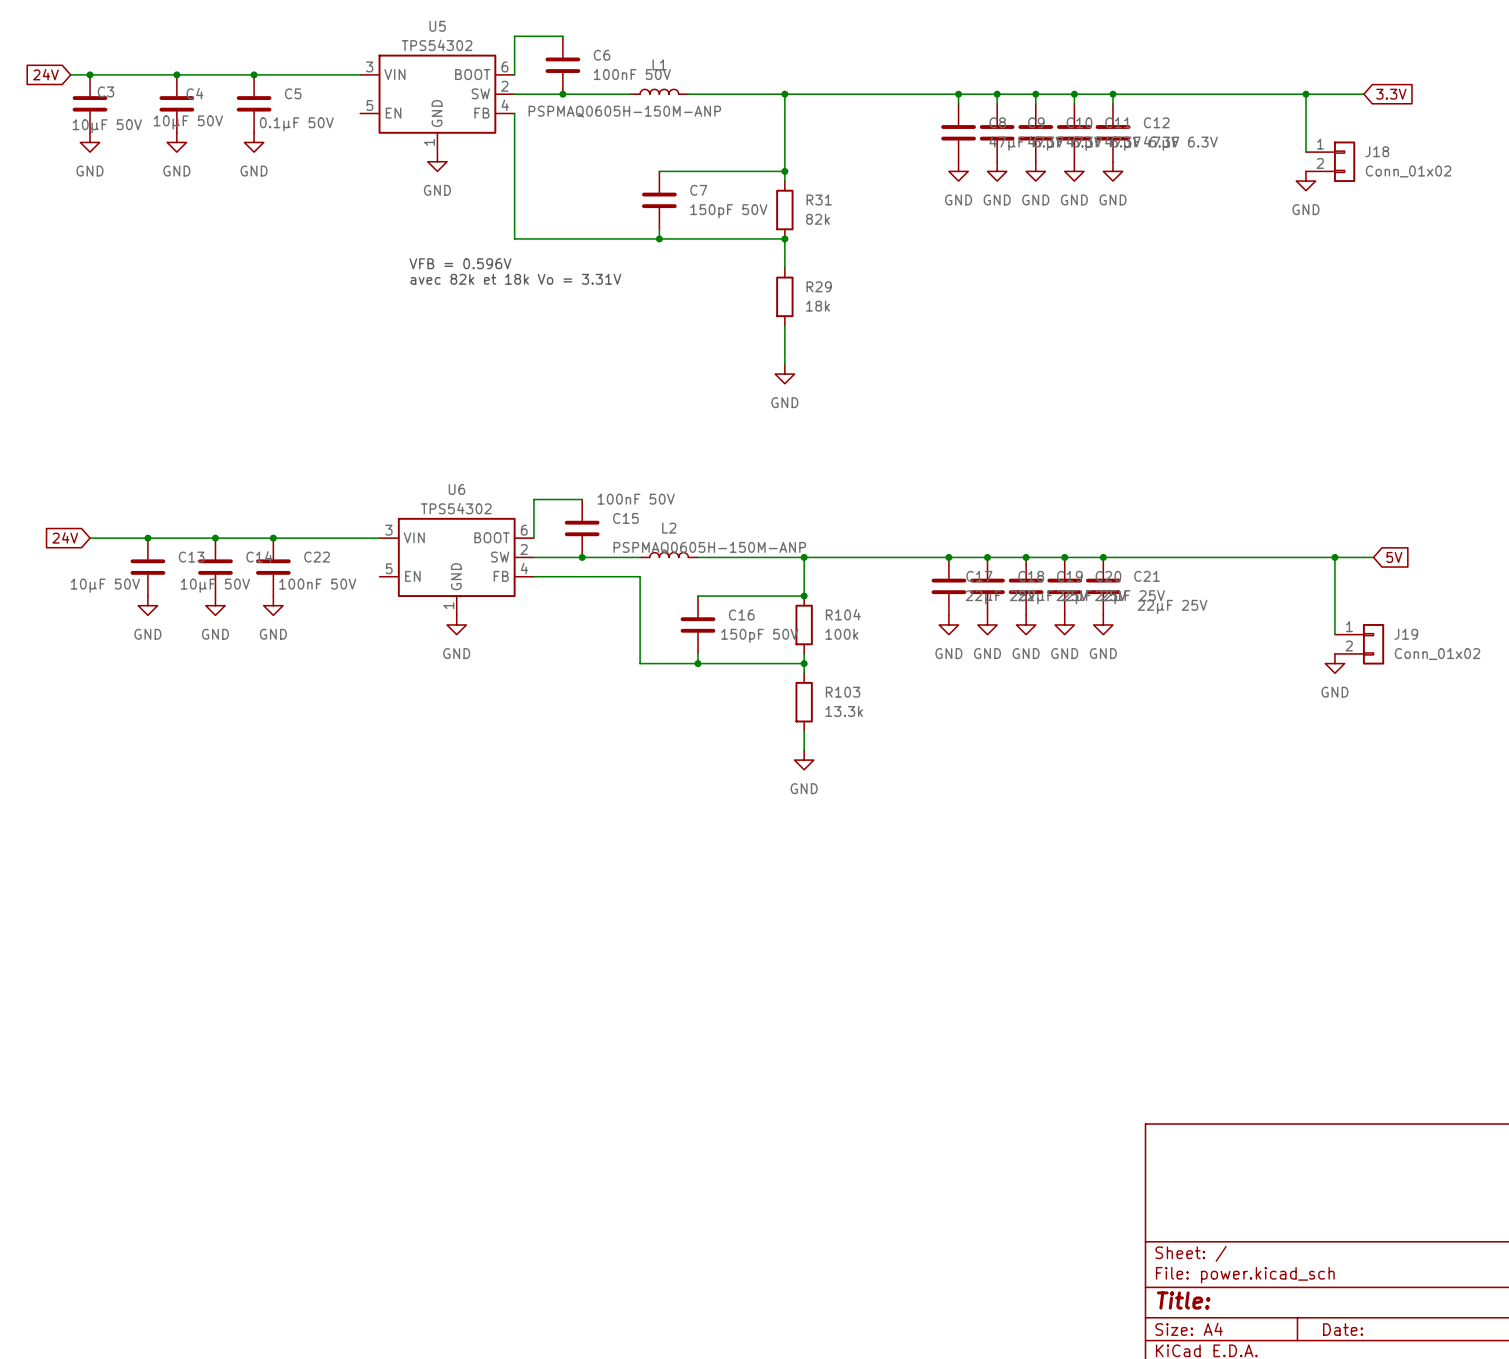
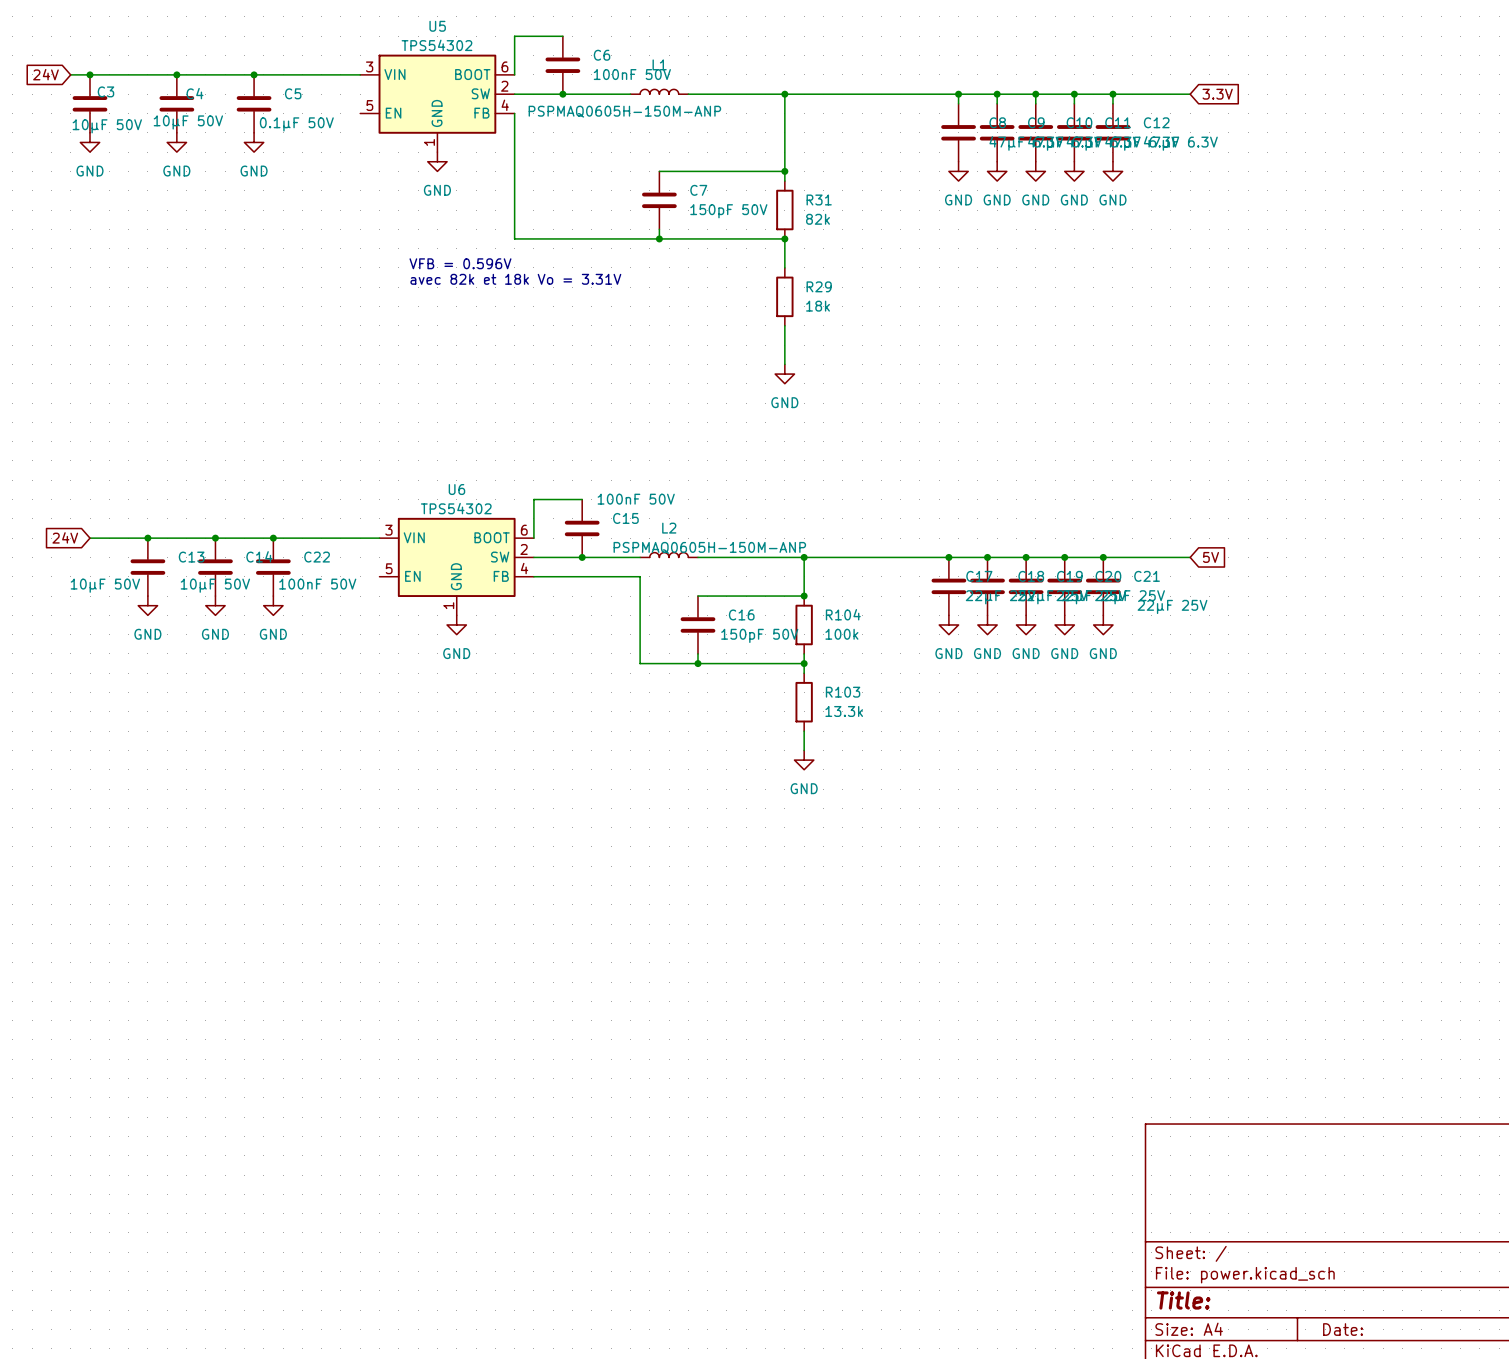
wire: (1190, 94) (1363, 94) -> none
wire: (1305, 94) (1305, 152) -> none
junction: (1305, 94) -> none
global label position: 3.3V (1391, 94) -> 3.3V (1217, 94)
J18: Conn_01x02 (1330, 161) -> none
power symbol: GND (1305, 181) -> none
wire: (1190, 557) (1373, 557) -> none
wire: (1334, 557) (1334, 634) -> none
junction: (1334, 557) -> none
global label position: 5V (1394, 557) -> 5V (1210, 557)
J19: Conn_01x02 (1359, 644) -> none
power symbol: GND (1334, 663) -> none

